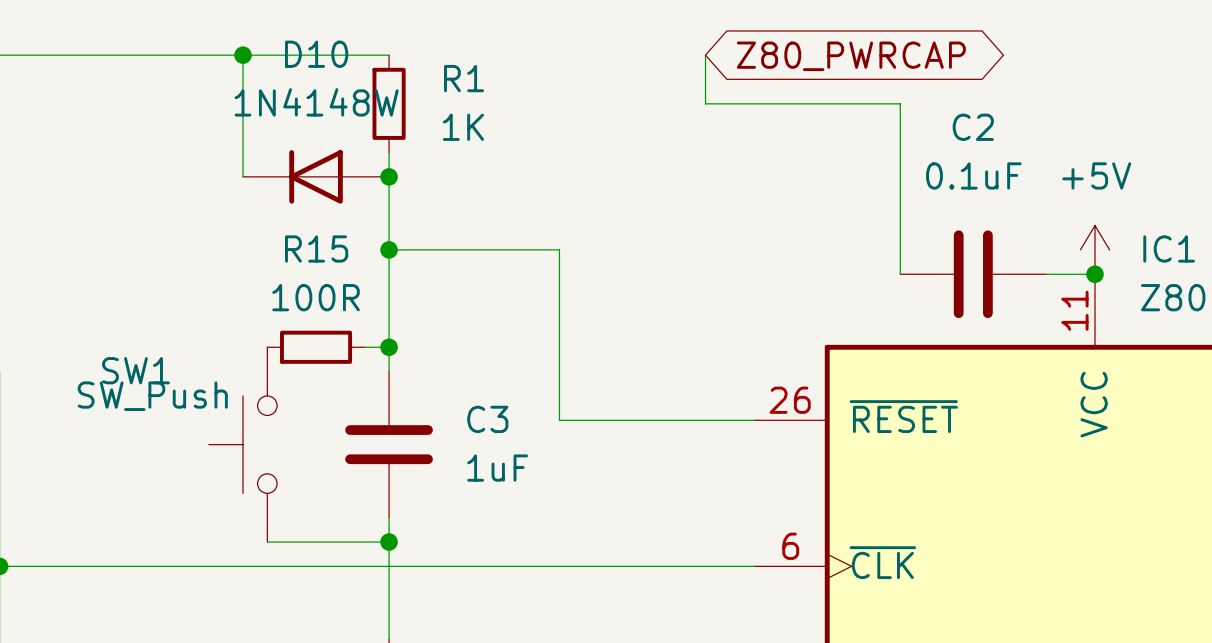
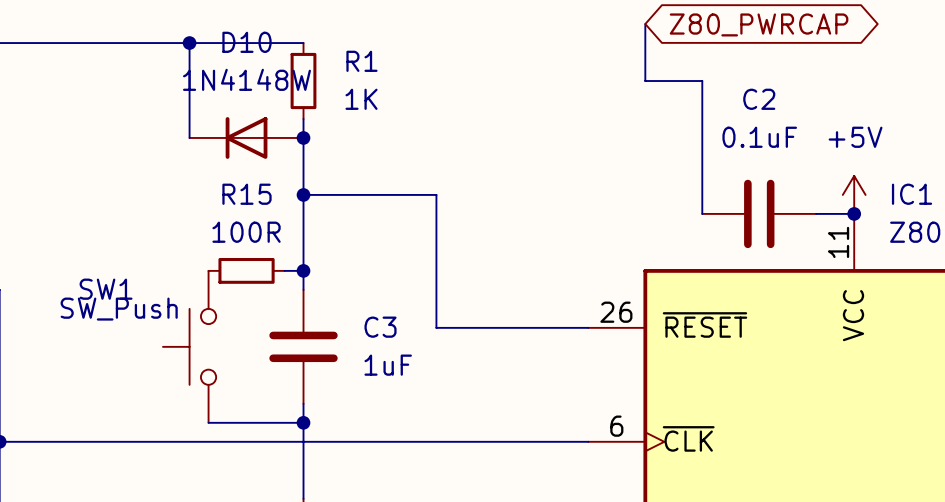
wire: (705, 55) (705, 103) (827, 103) -> (645, 24) (645, 81)
global label position: Z80_PWRCAP (851, 56) -> Z80_PWRCAP (759, 24)

